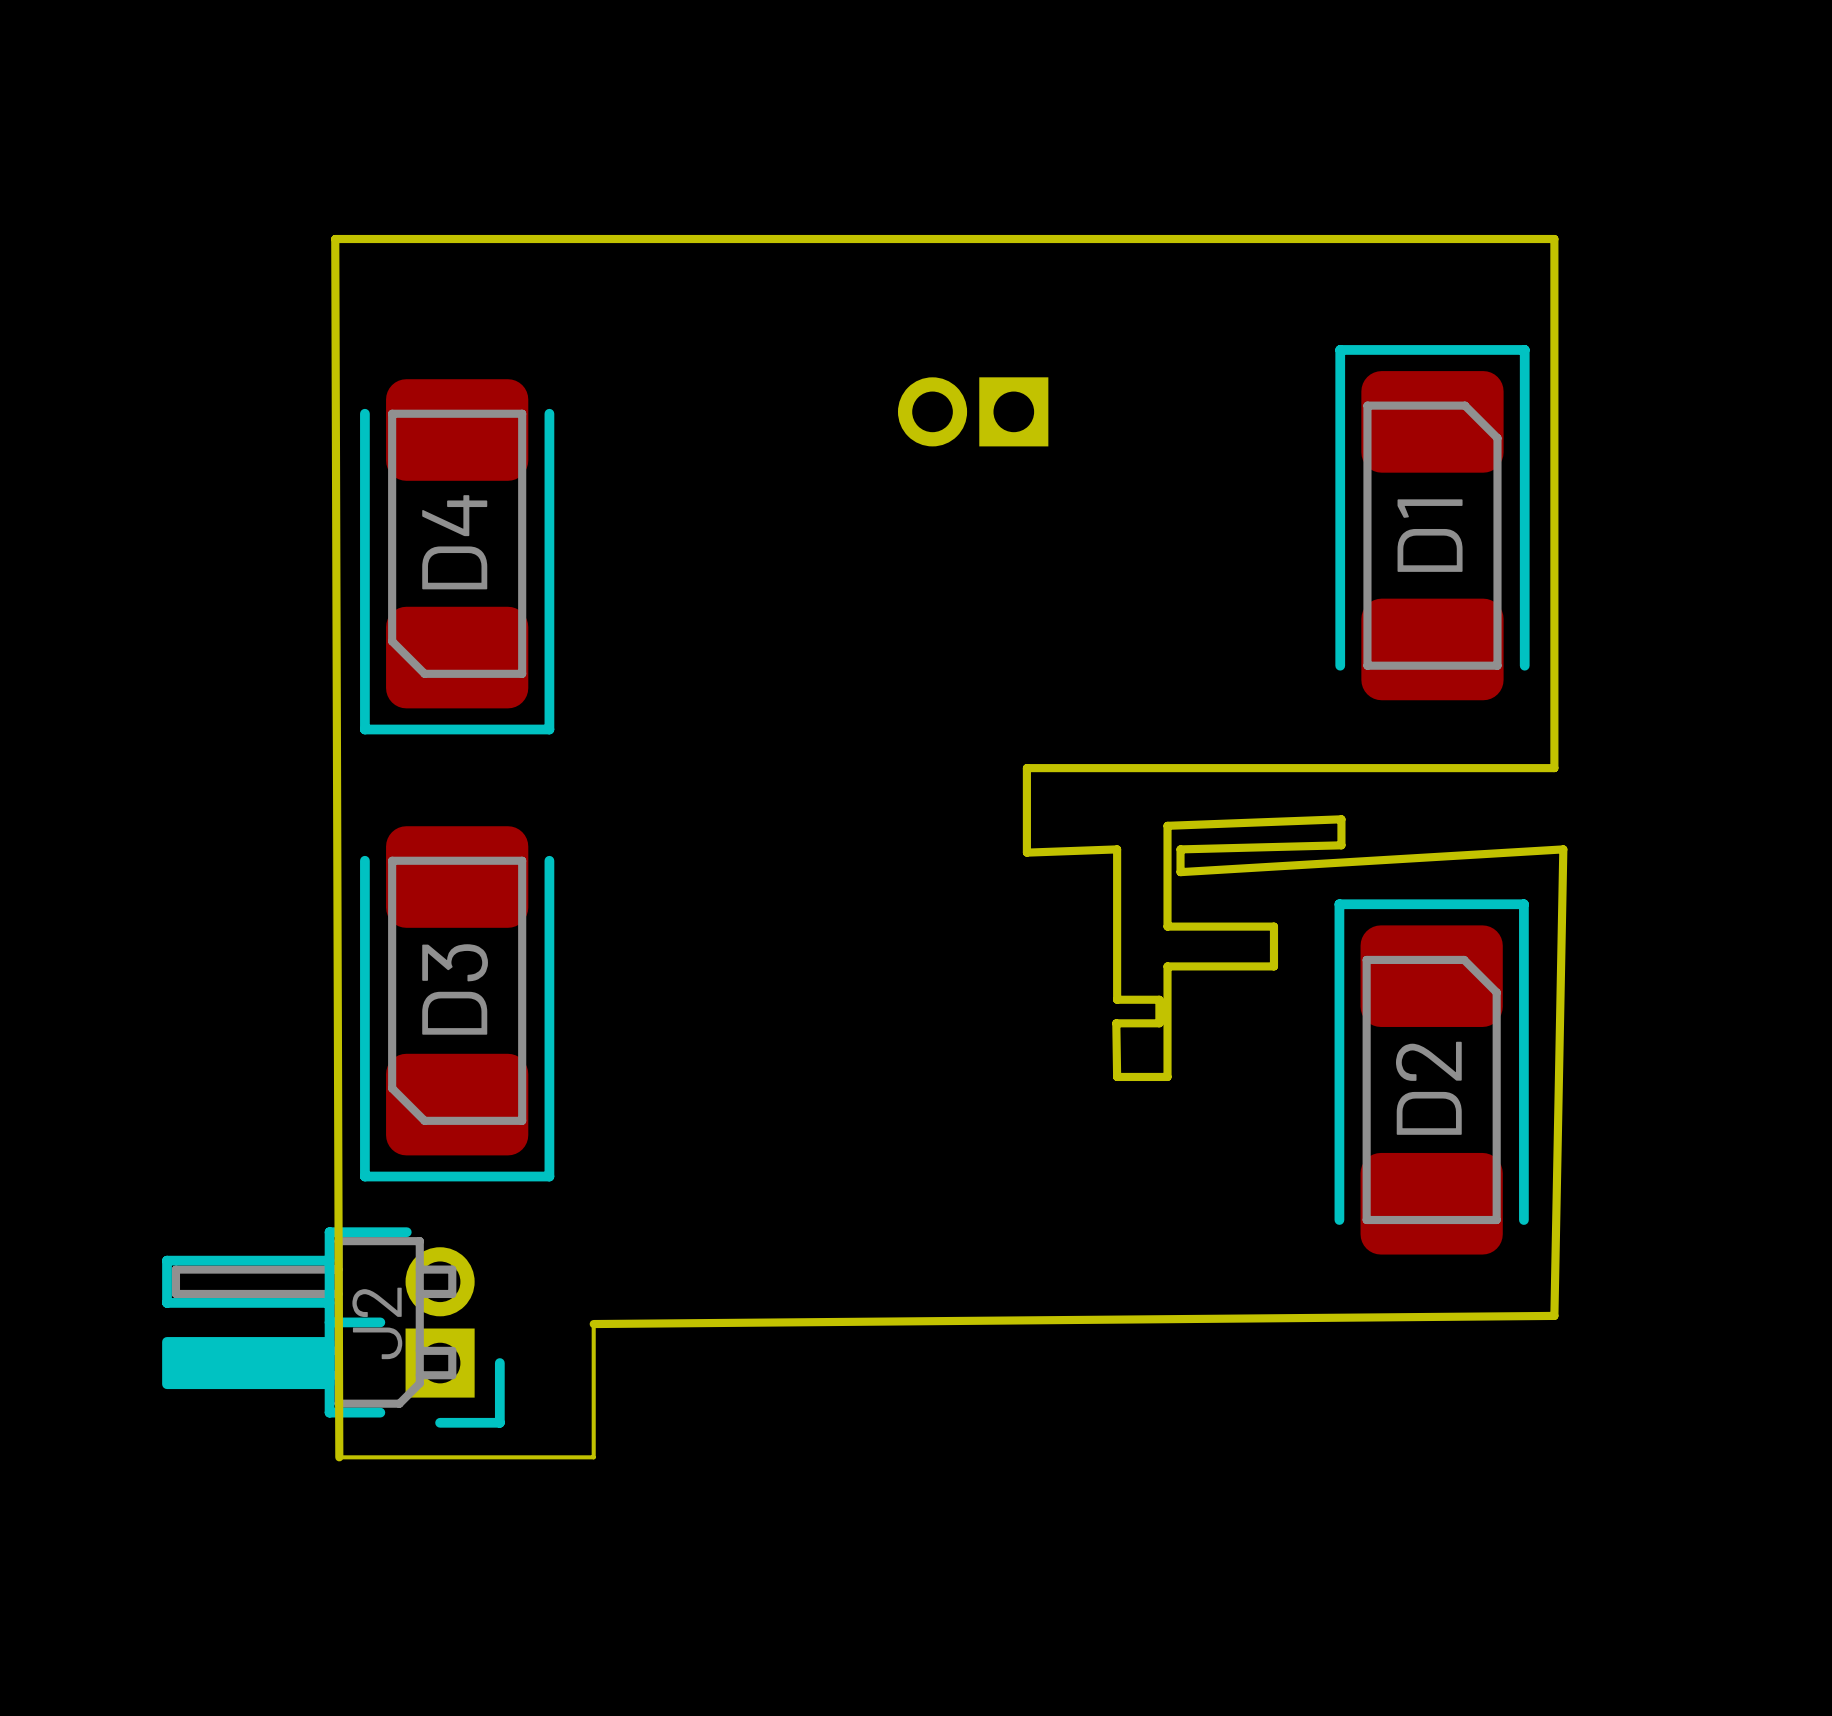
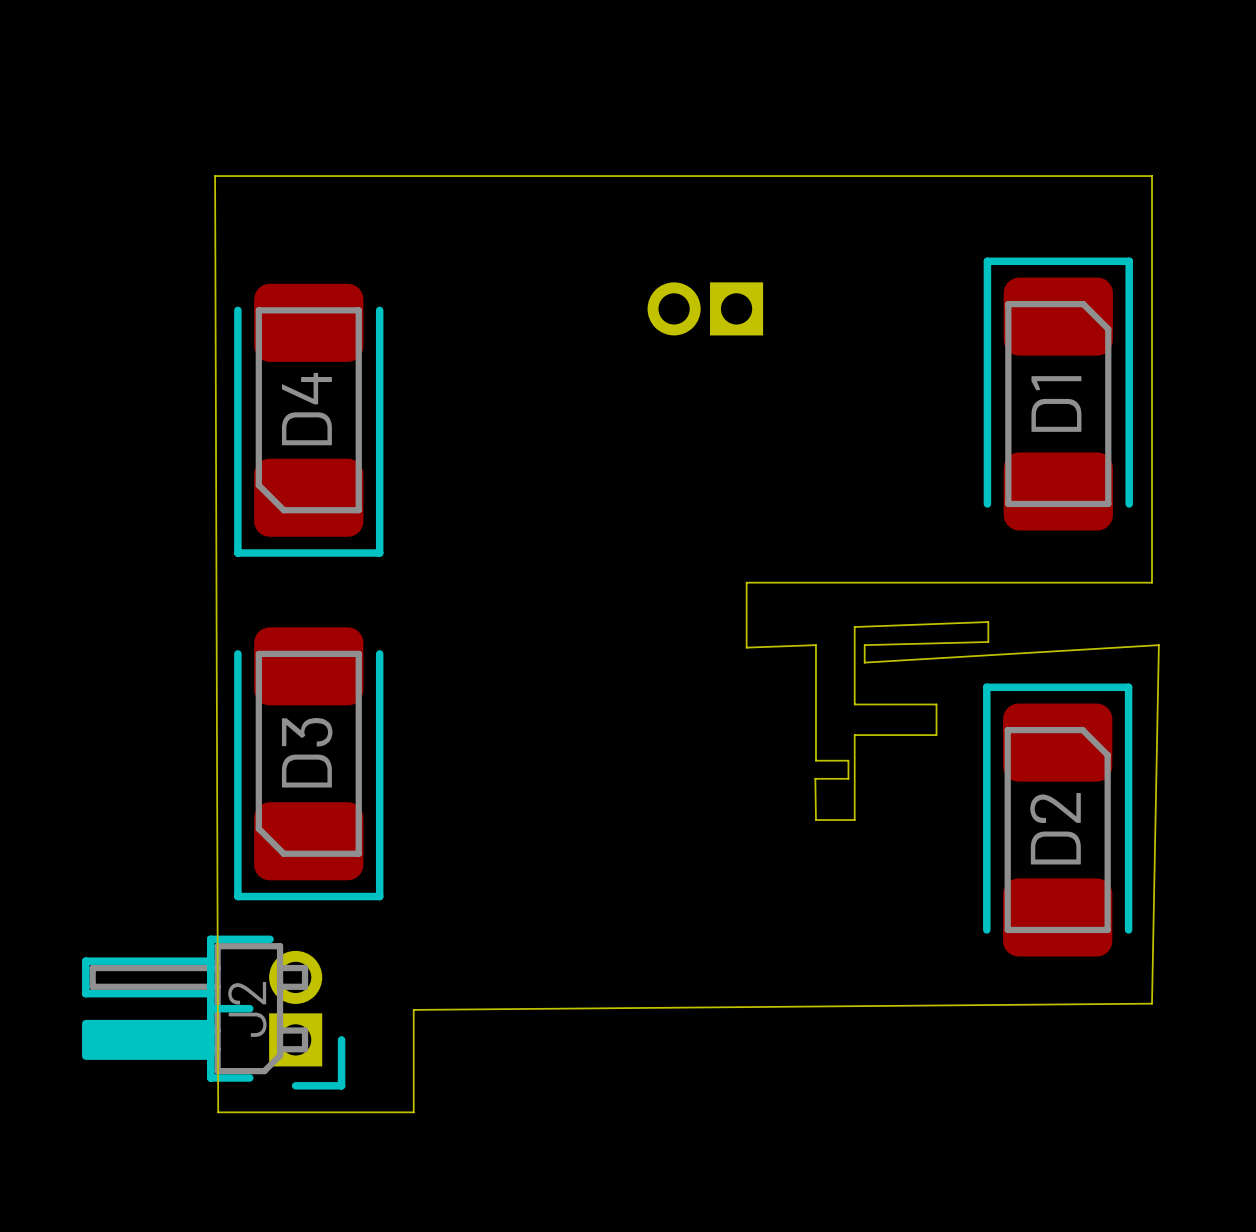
board edge width: thick (335, 239) (1554, 239) (1554, 768) (1026, 768) (1026, 852) (1117, 849) (1117, 999) (1159, 999) (1159, 1023) (1116, 1023) (1117, 1076) (1167, 1076) (1167, 966) (1273, 966) (1273, 926) (1167, 926) (1167, 825) (1341, 819) (1341, 845) (1180, 849) (1180, 872) (1563, 849) (1554, 1315) (593, 1324) (593, 1457) (339, 1457) (335, 239) -> thin (215, 176) (1152, 176) (1152, 582) (746, 582) (746, 647) (815, 645) (815, 760) (848, 760) (848, 778) (815, 778) (815, 820) (854, 820) (854, 735) (936, 735) (936, 704) (854, 704) (854, 627) (988, 622) (988, 642) (864, 645) (864, 662) (1158, 645) (1152, 1003) (413, 1009) (413, 1112) (218, 1112) (215, 176)

